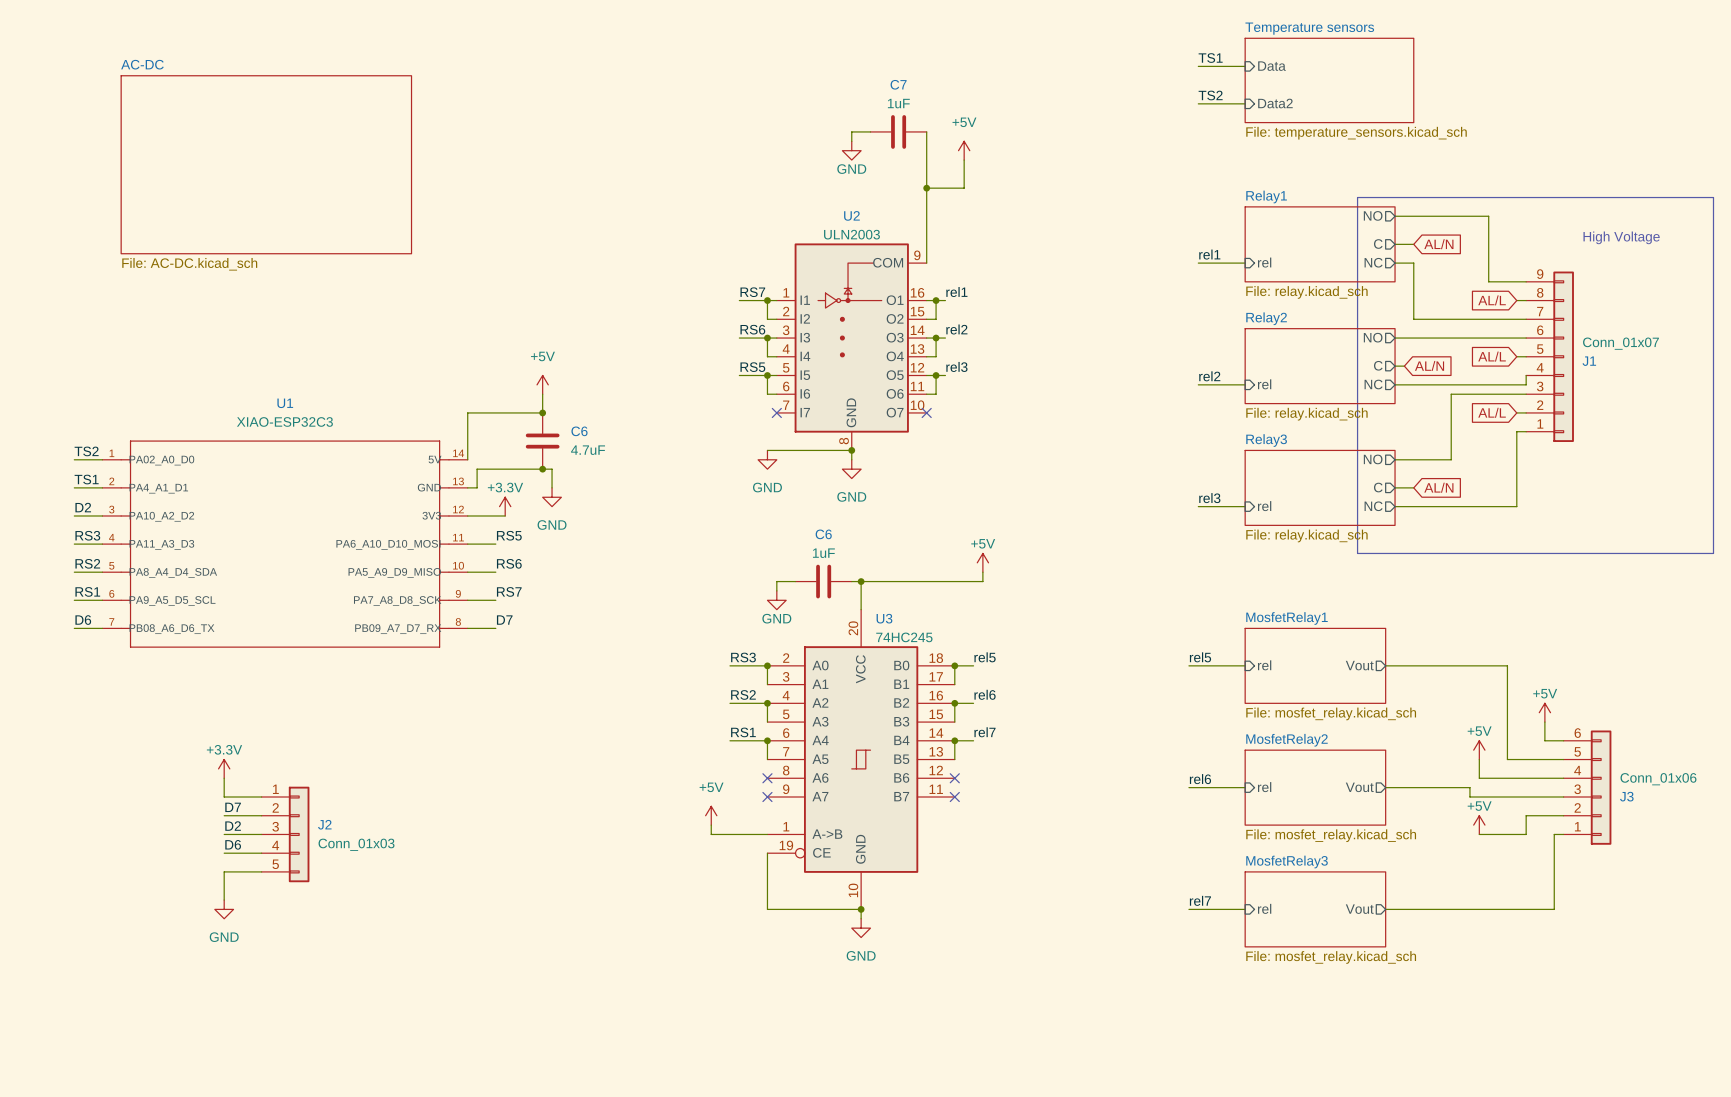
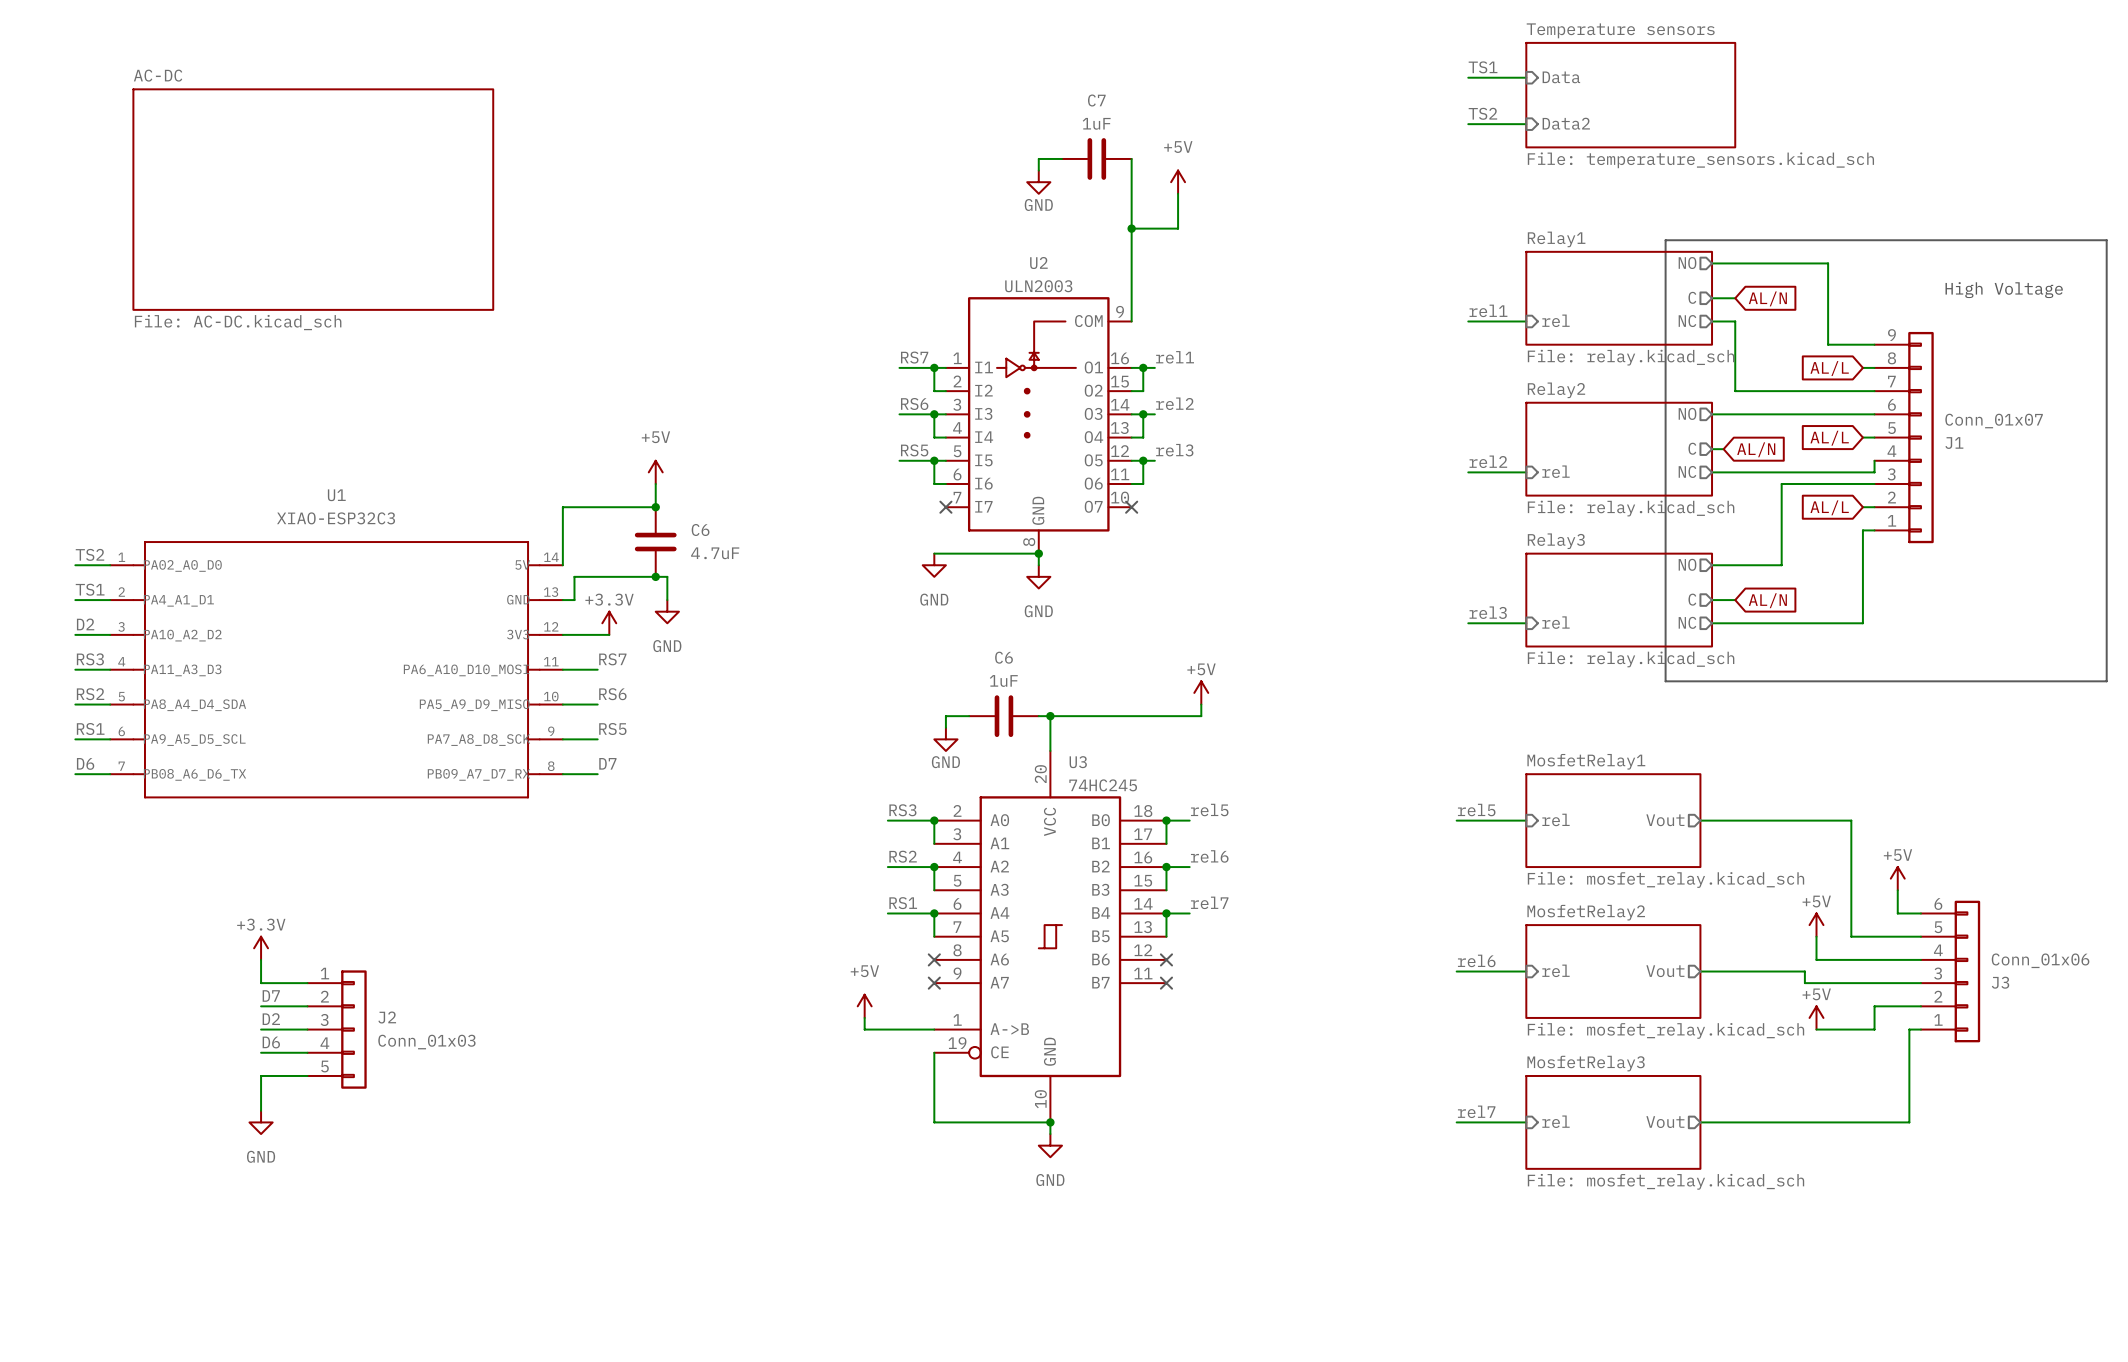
label: RS5 (509, 535) -> RS7 (612, 659)
label: RS7 (509, 591) -> RS5 (612, 729)

